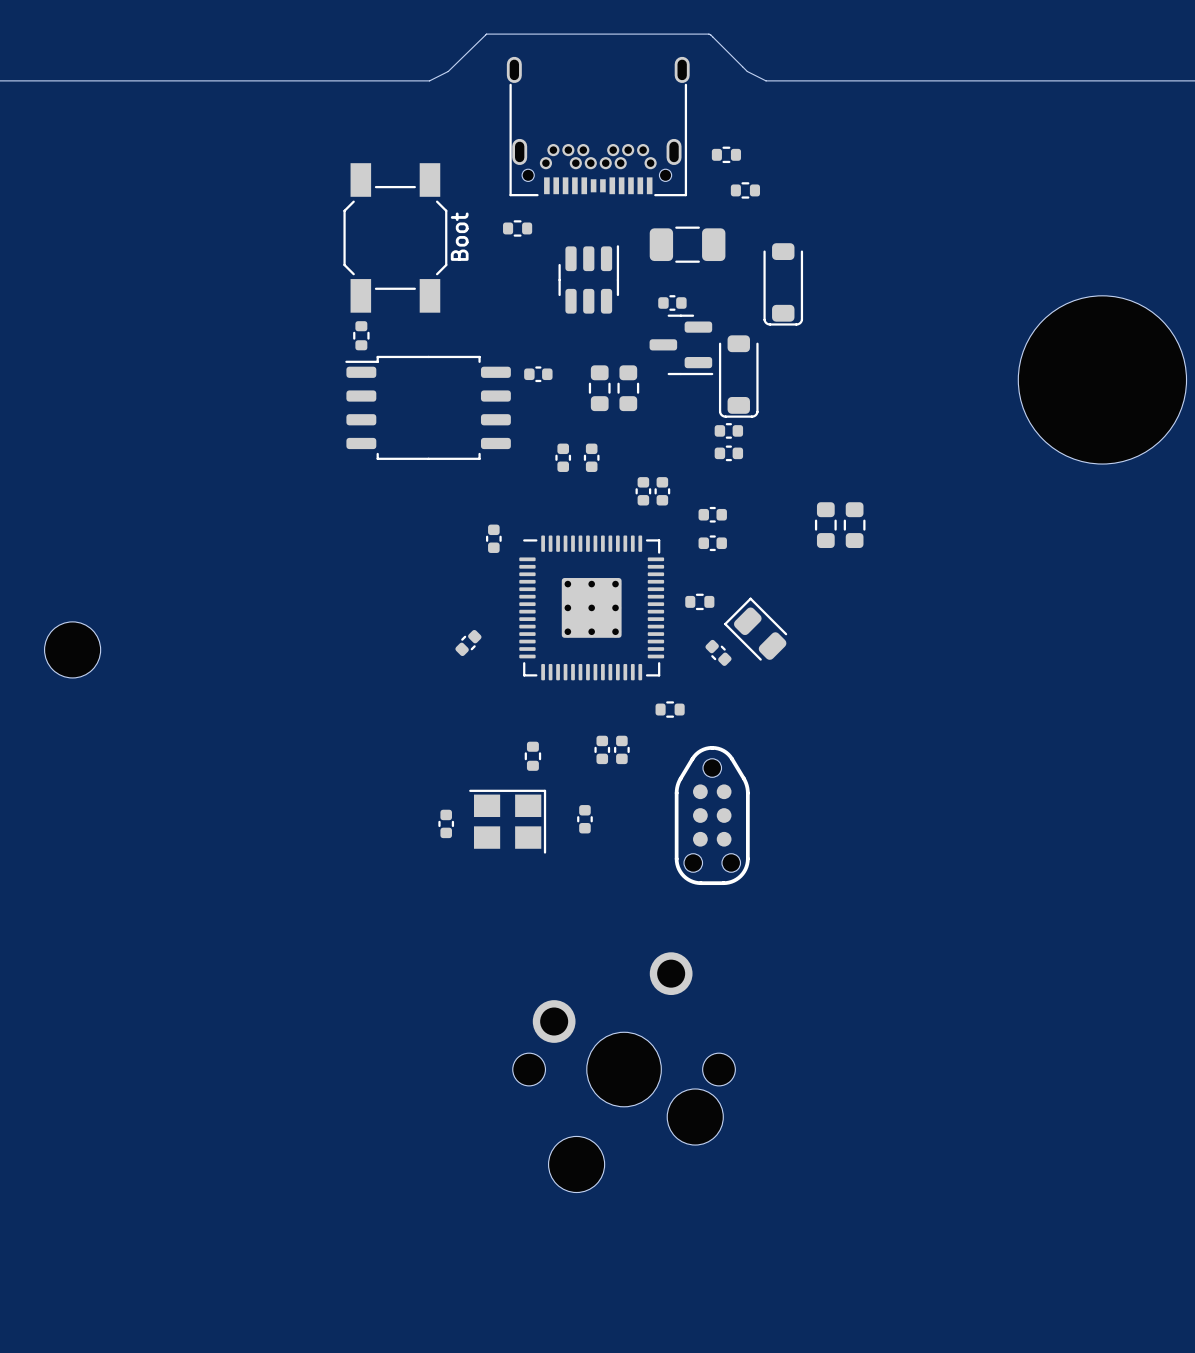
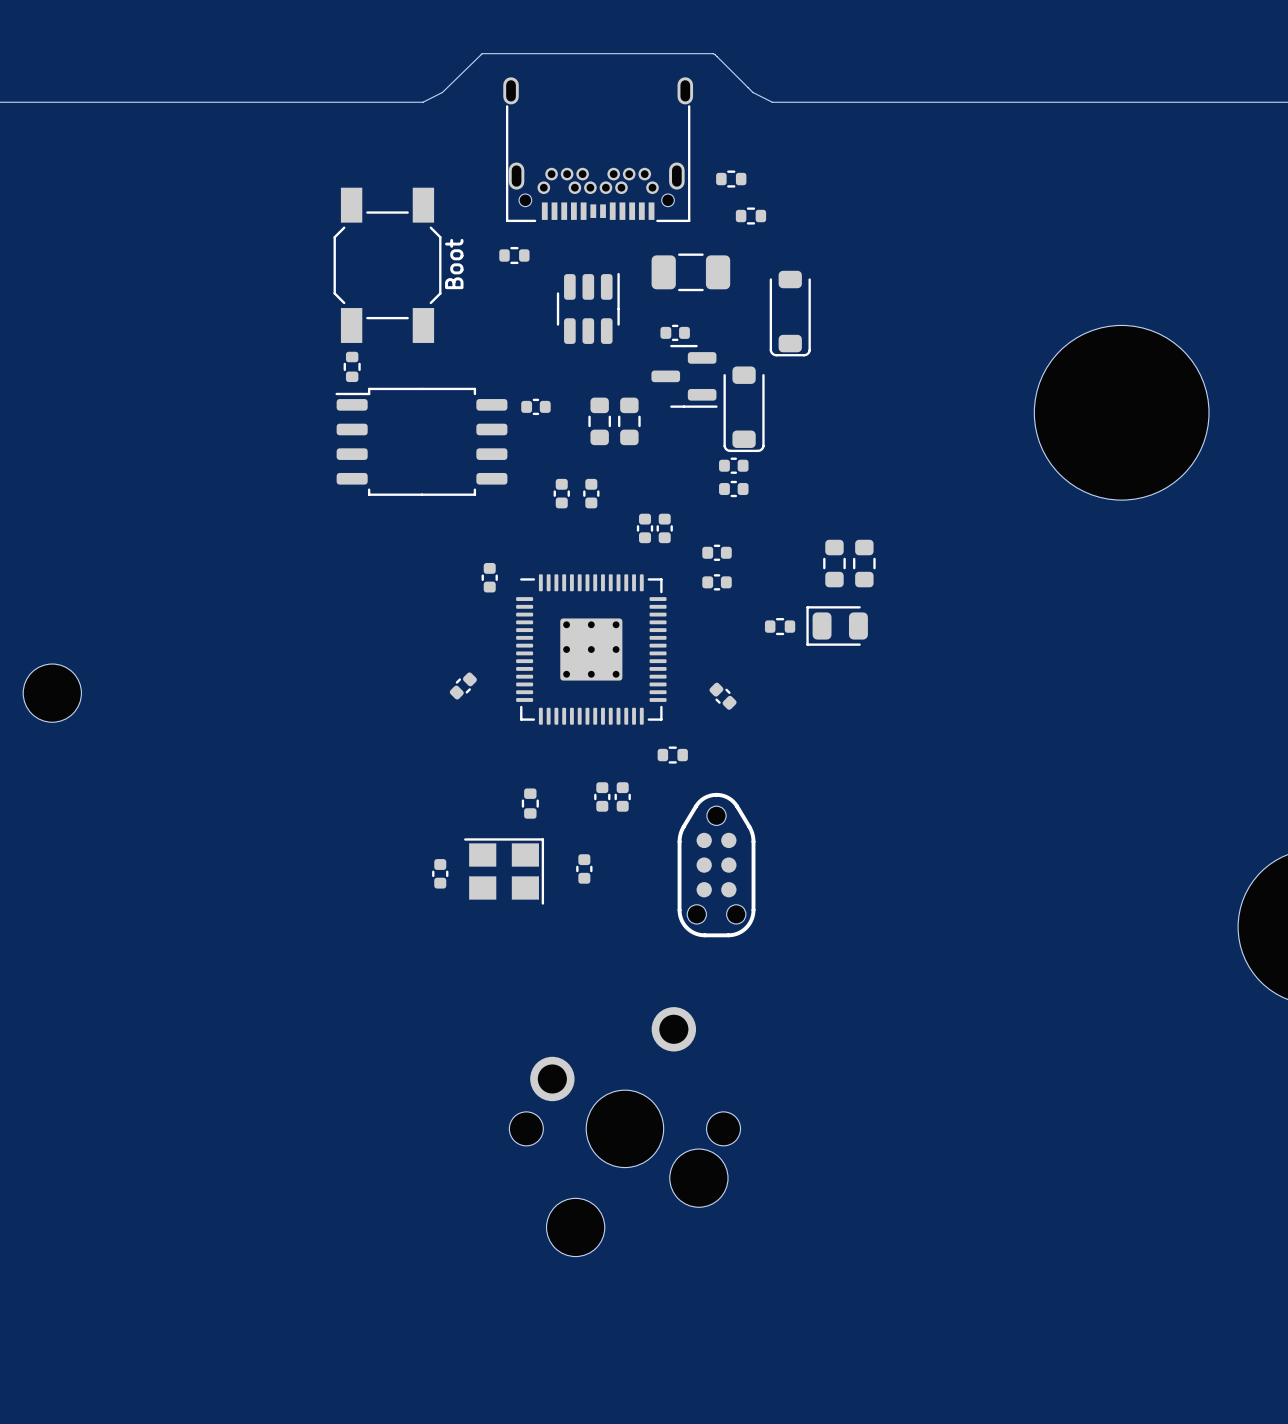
part: none -> (837, 625)
part position: (699, 601) -> (780, 626)
part: (755, 629) -> none

